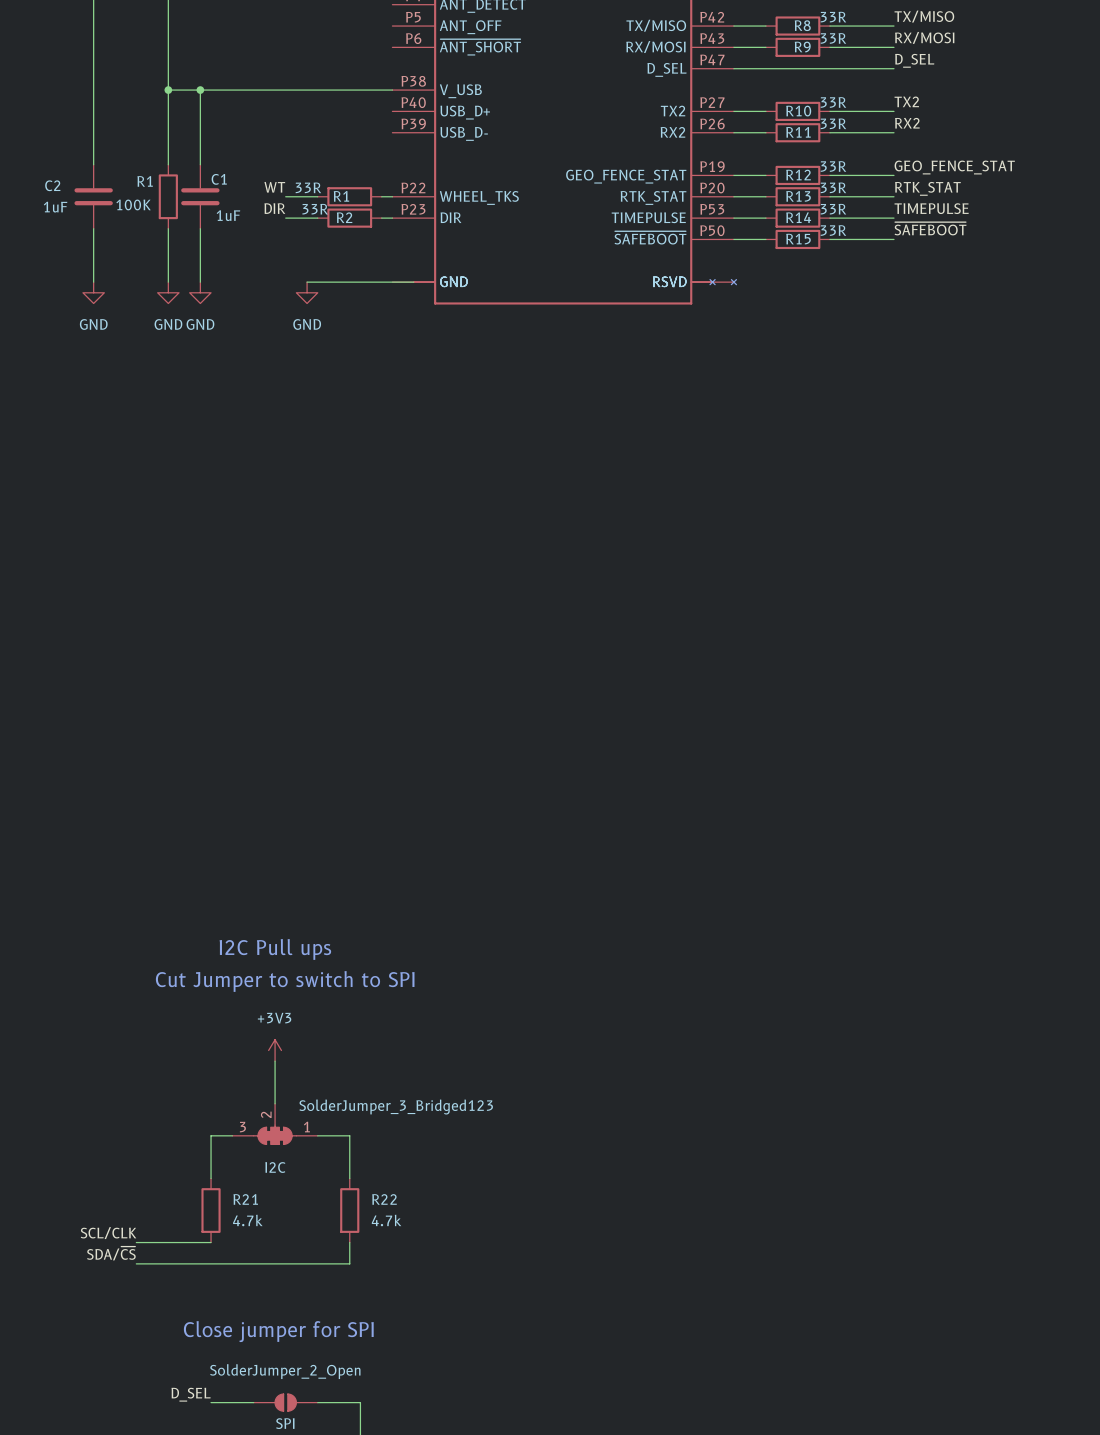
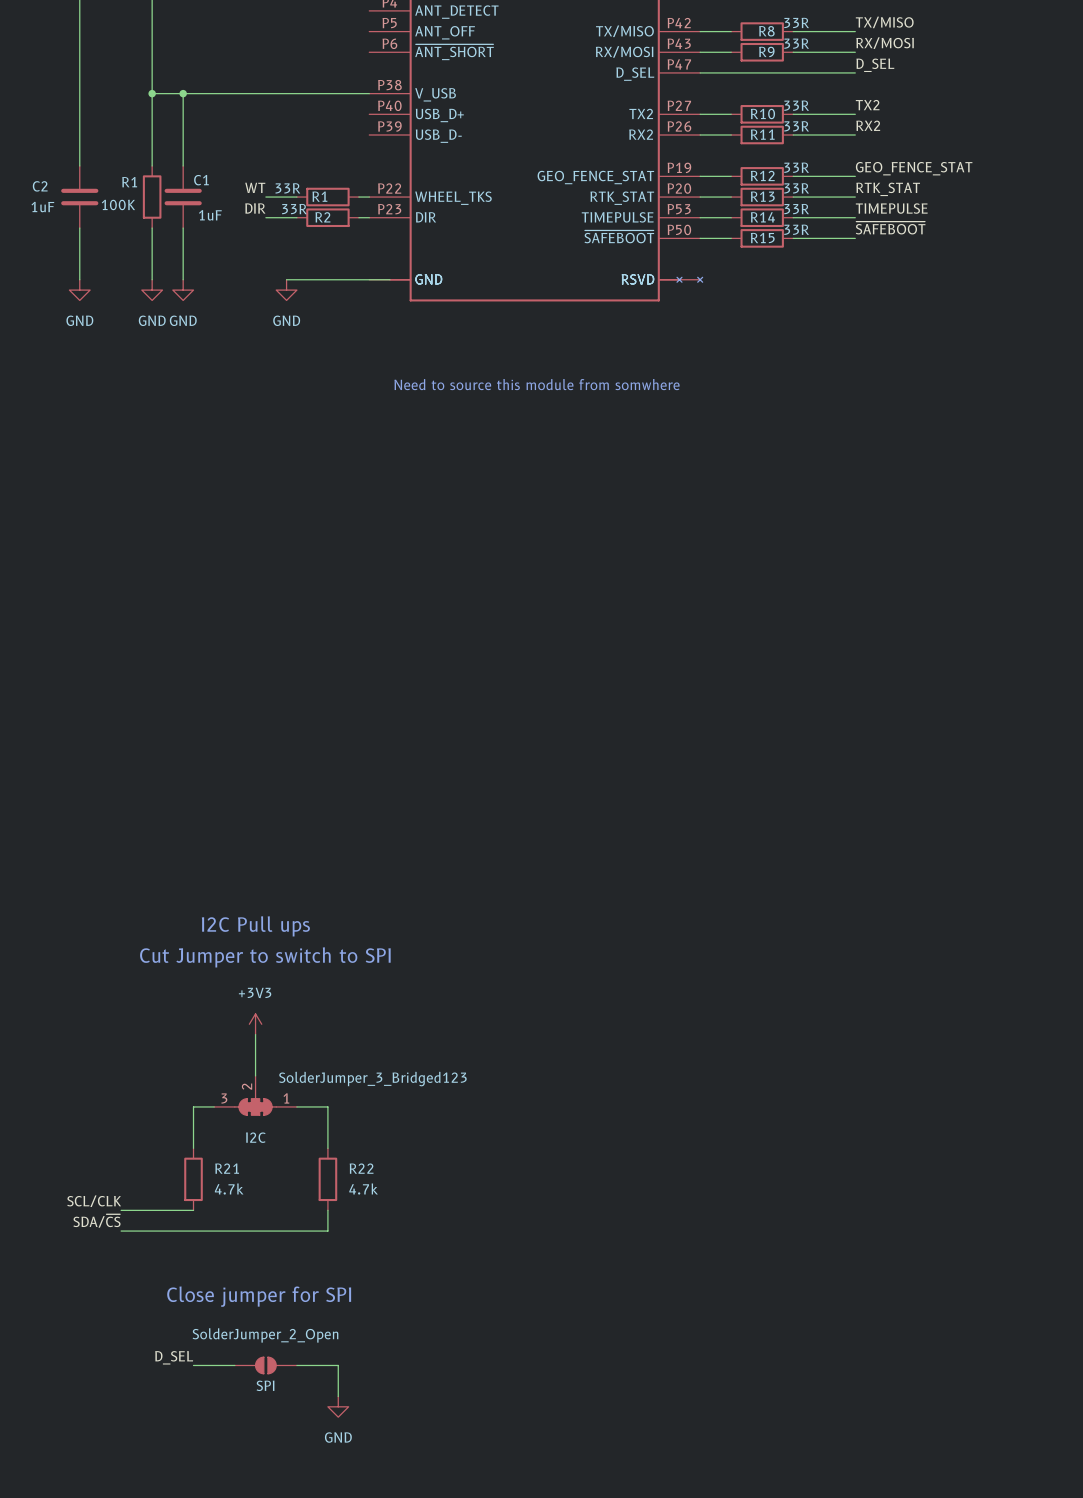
text: none -> Need to source this module from somwhere (537, 384)

